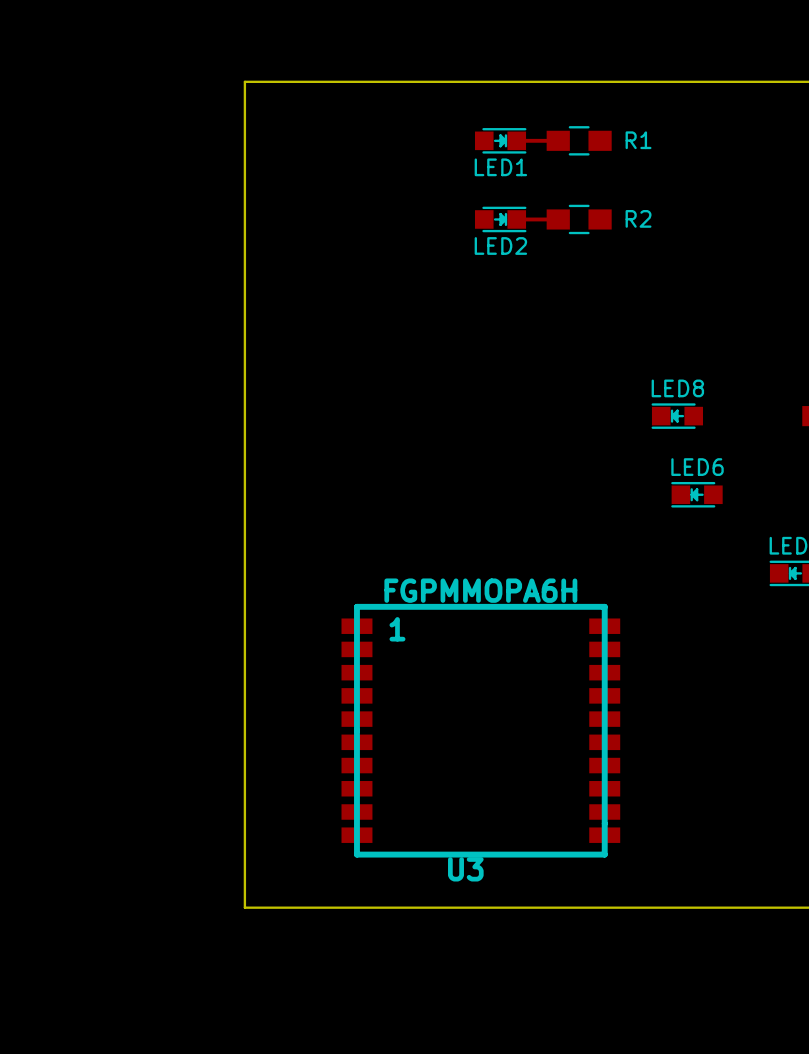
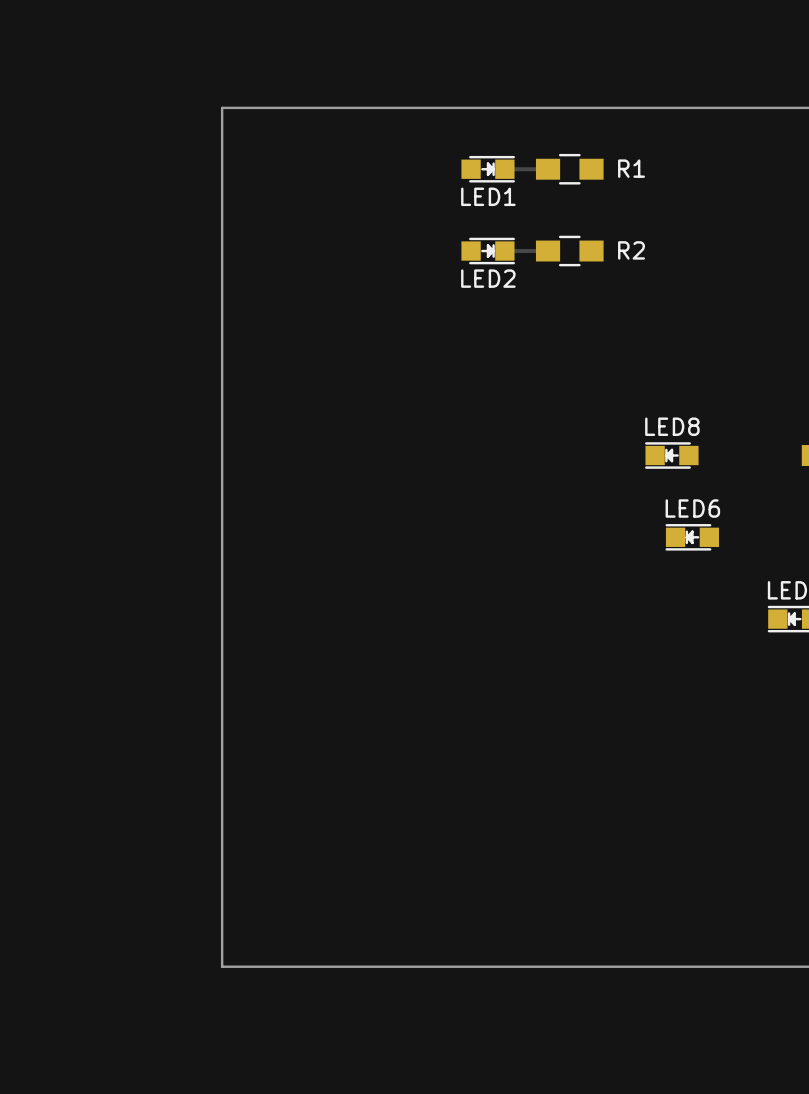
U3: FGPMMOPA6H (480, 730) -> none

